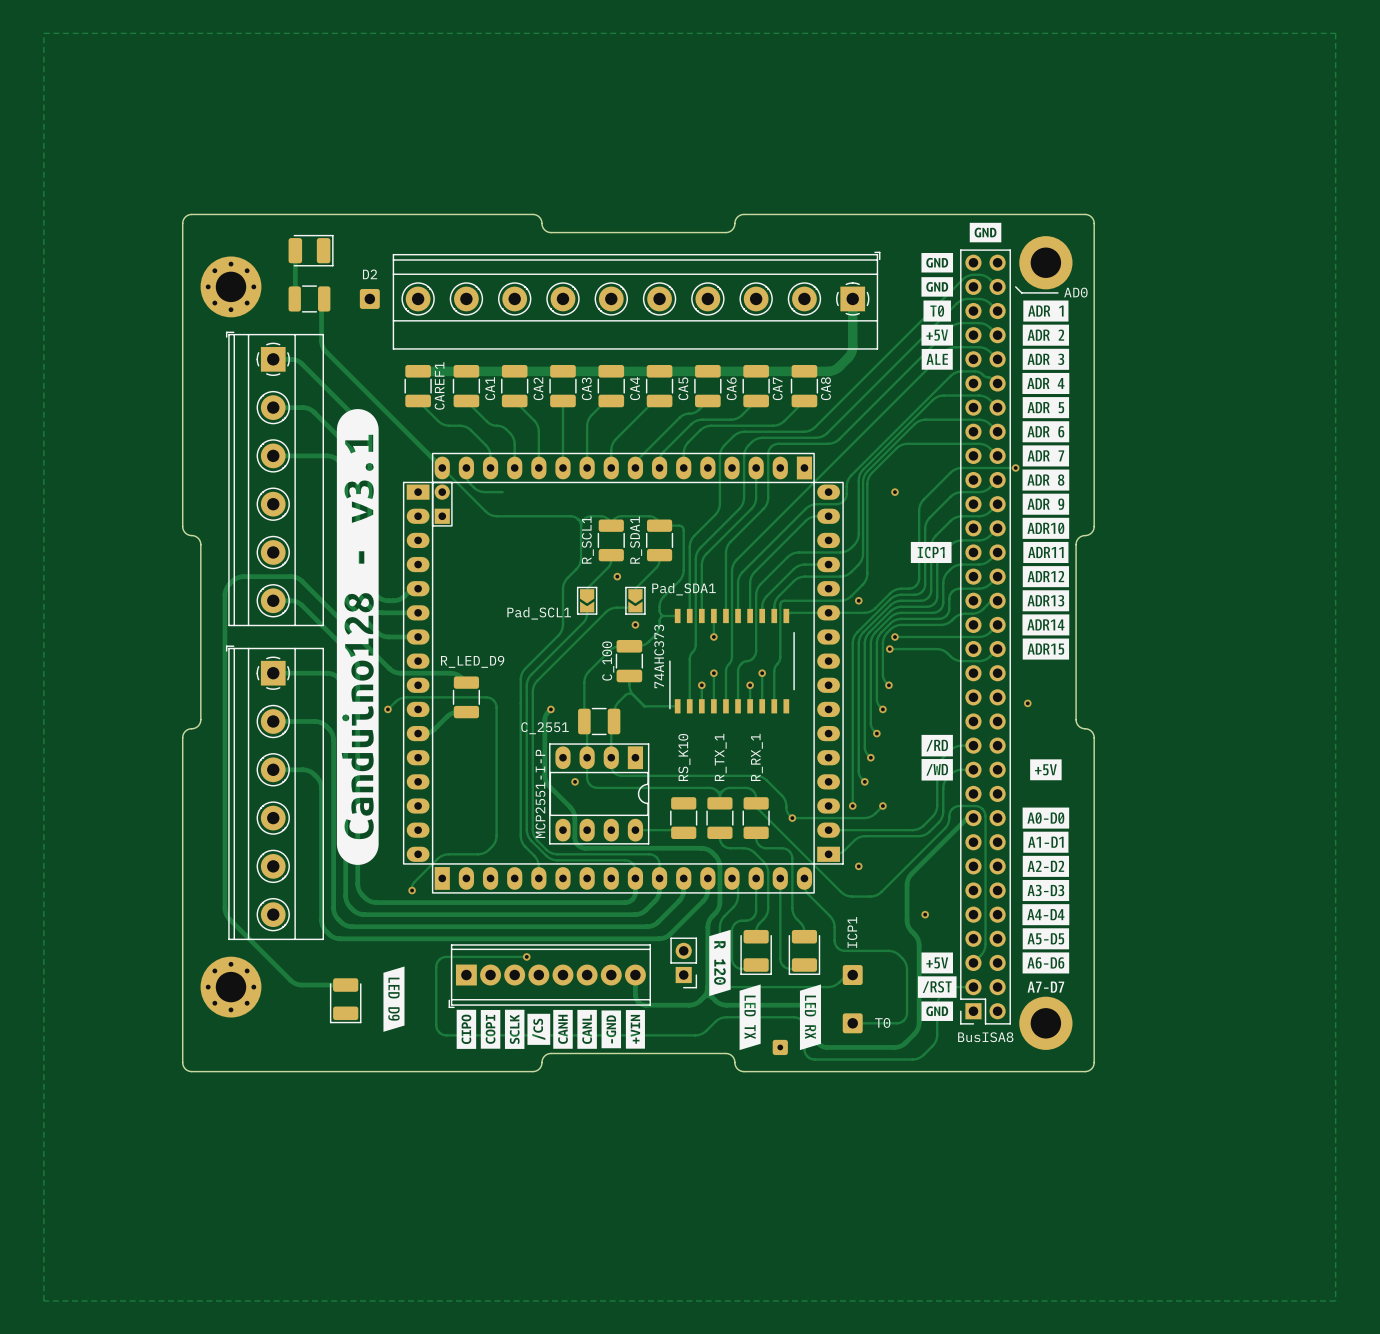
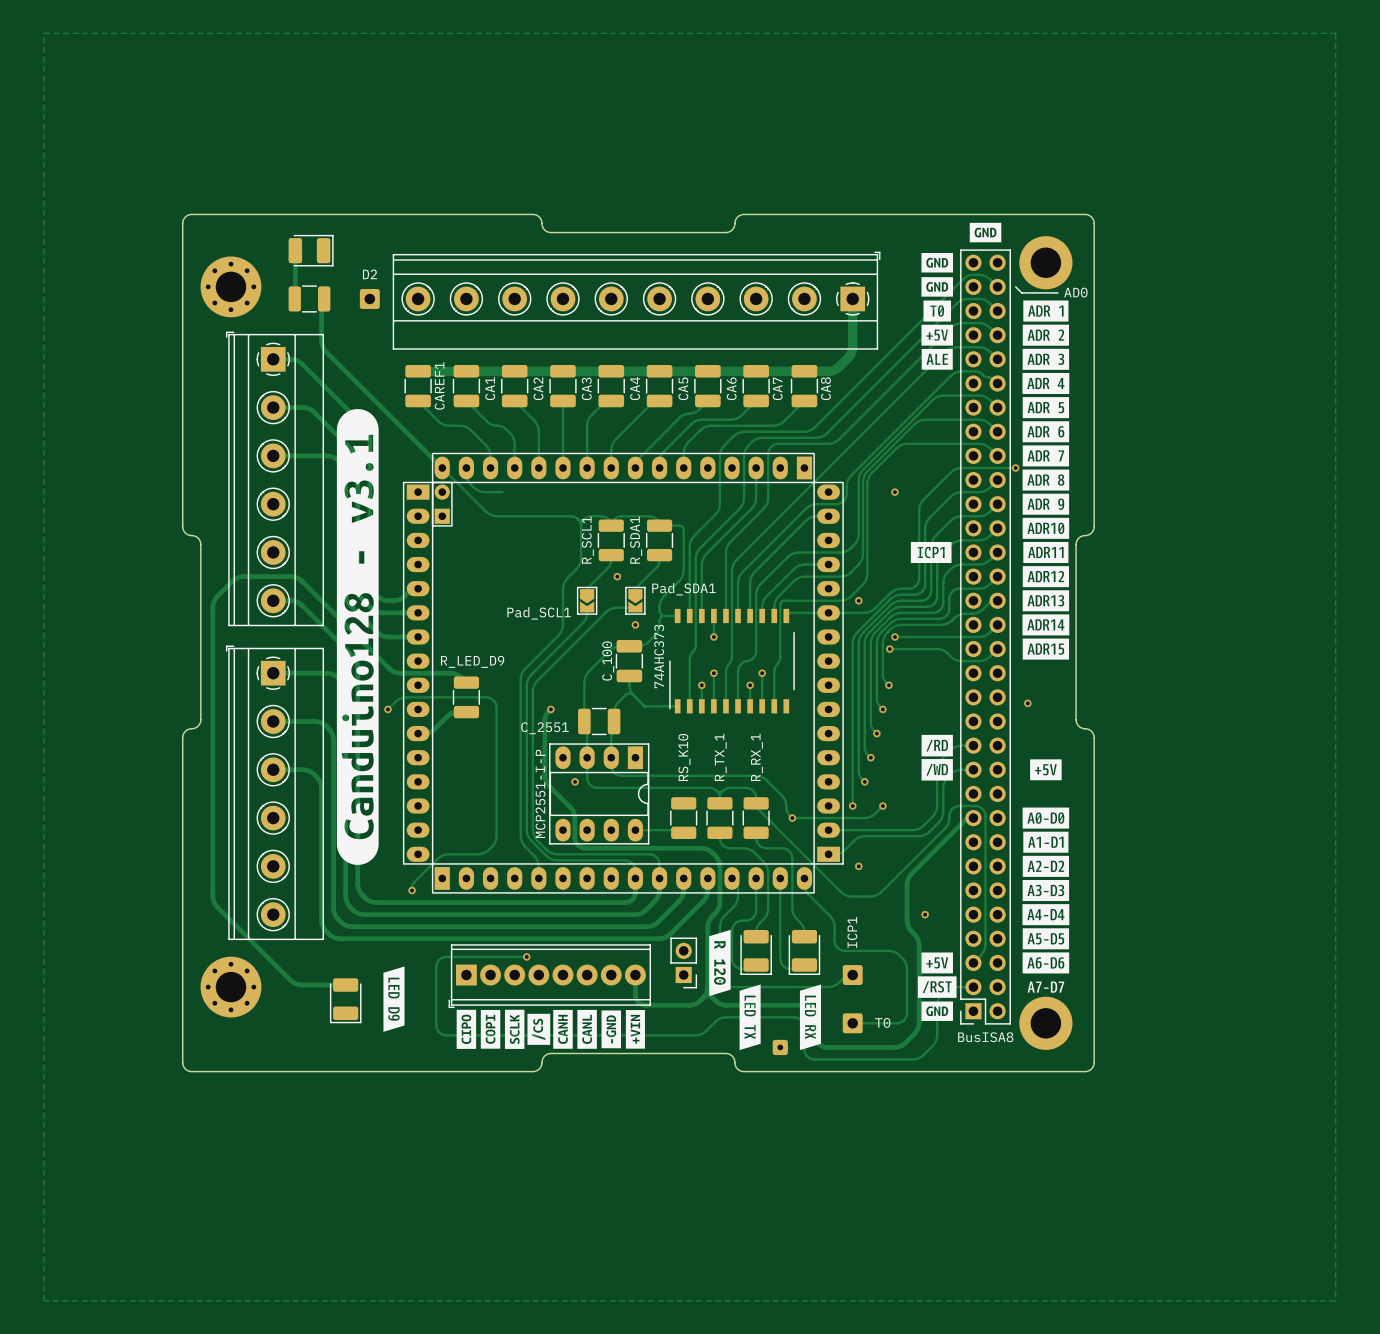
track: (229, 584) (224, 595) (224, 908) (229, 919) -> (229, 584) (215, 598) (212, 607) (212, 897) (216, 906) (229, 919)

